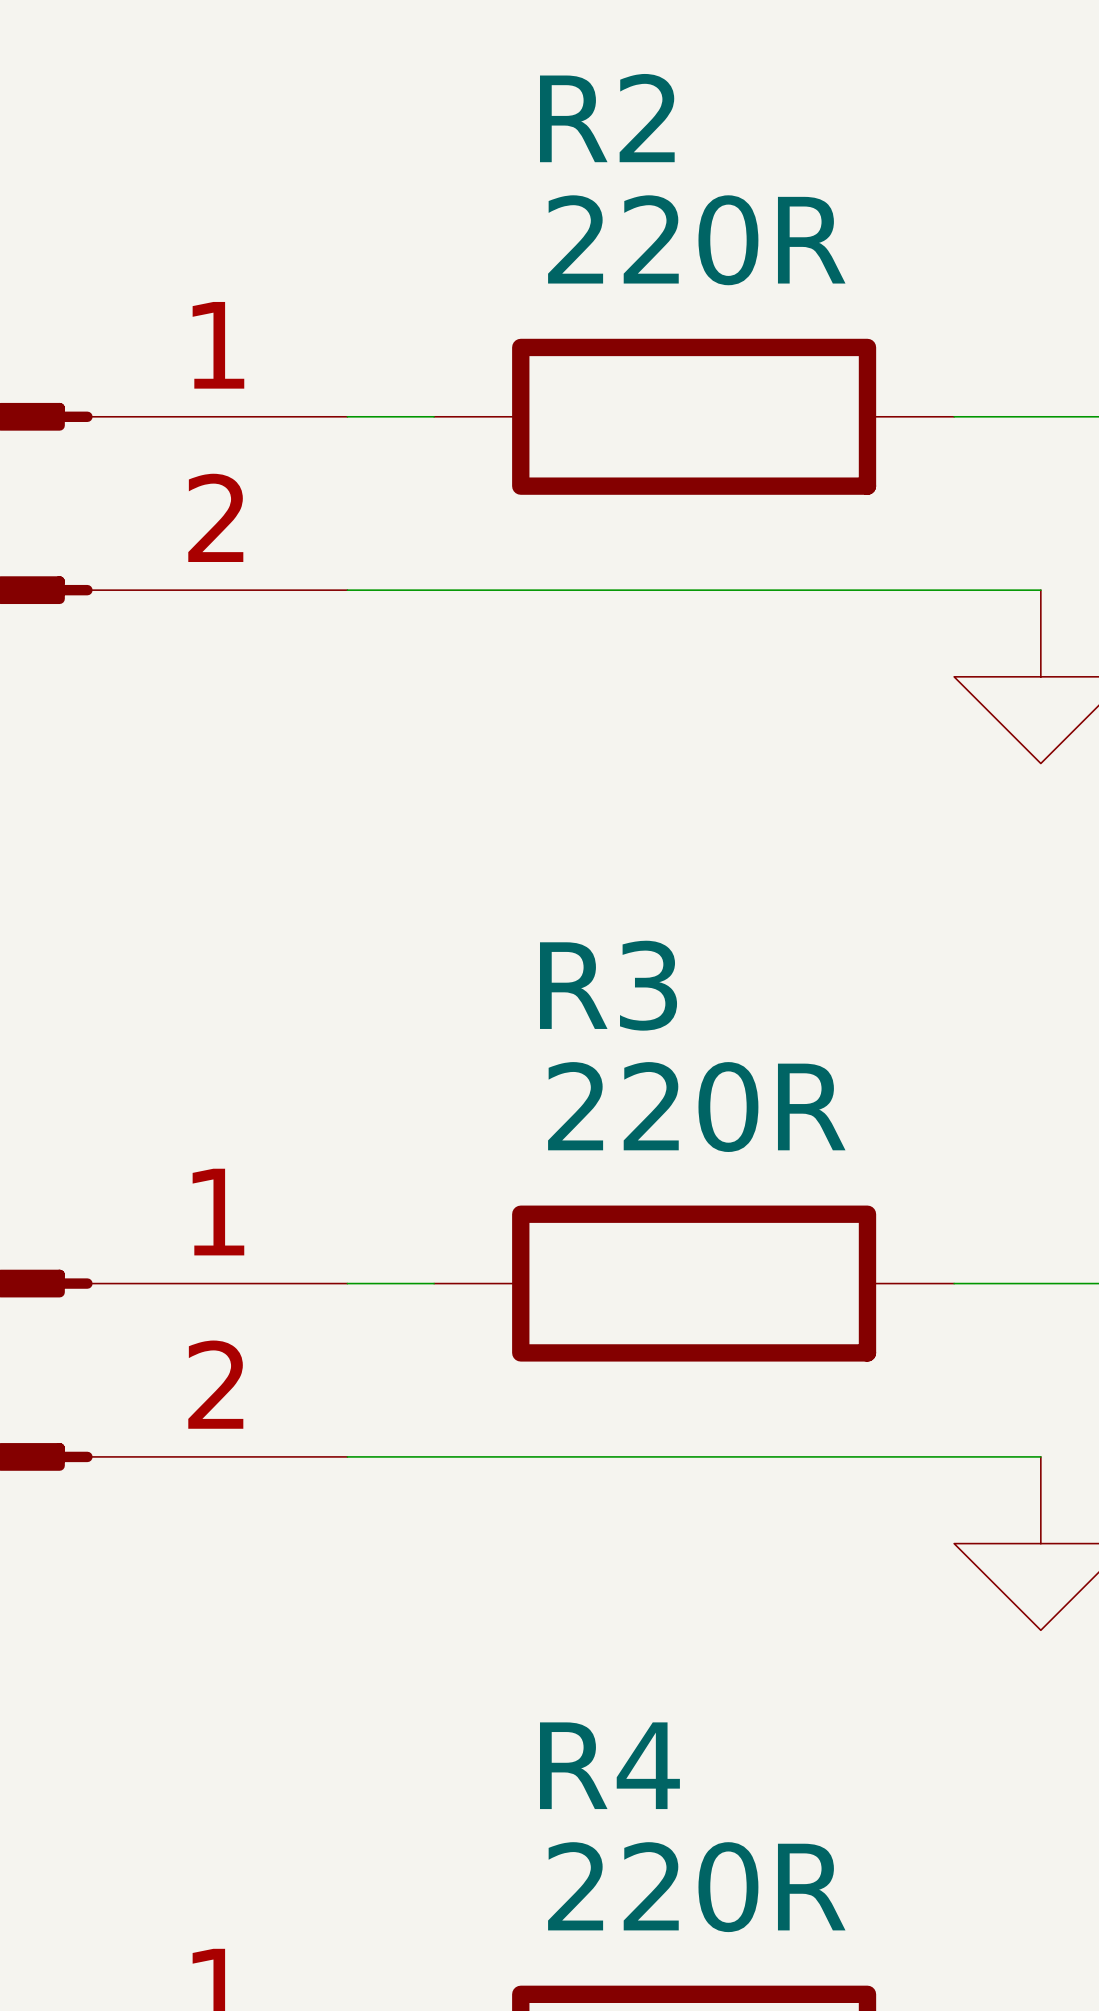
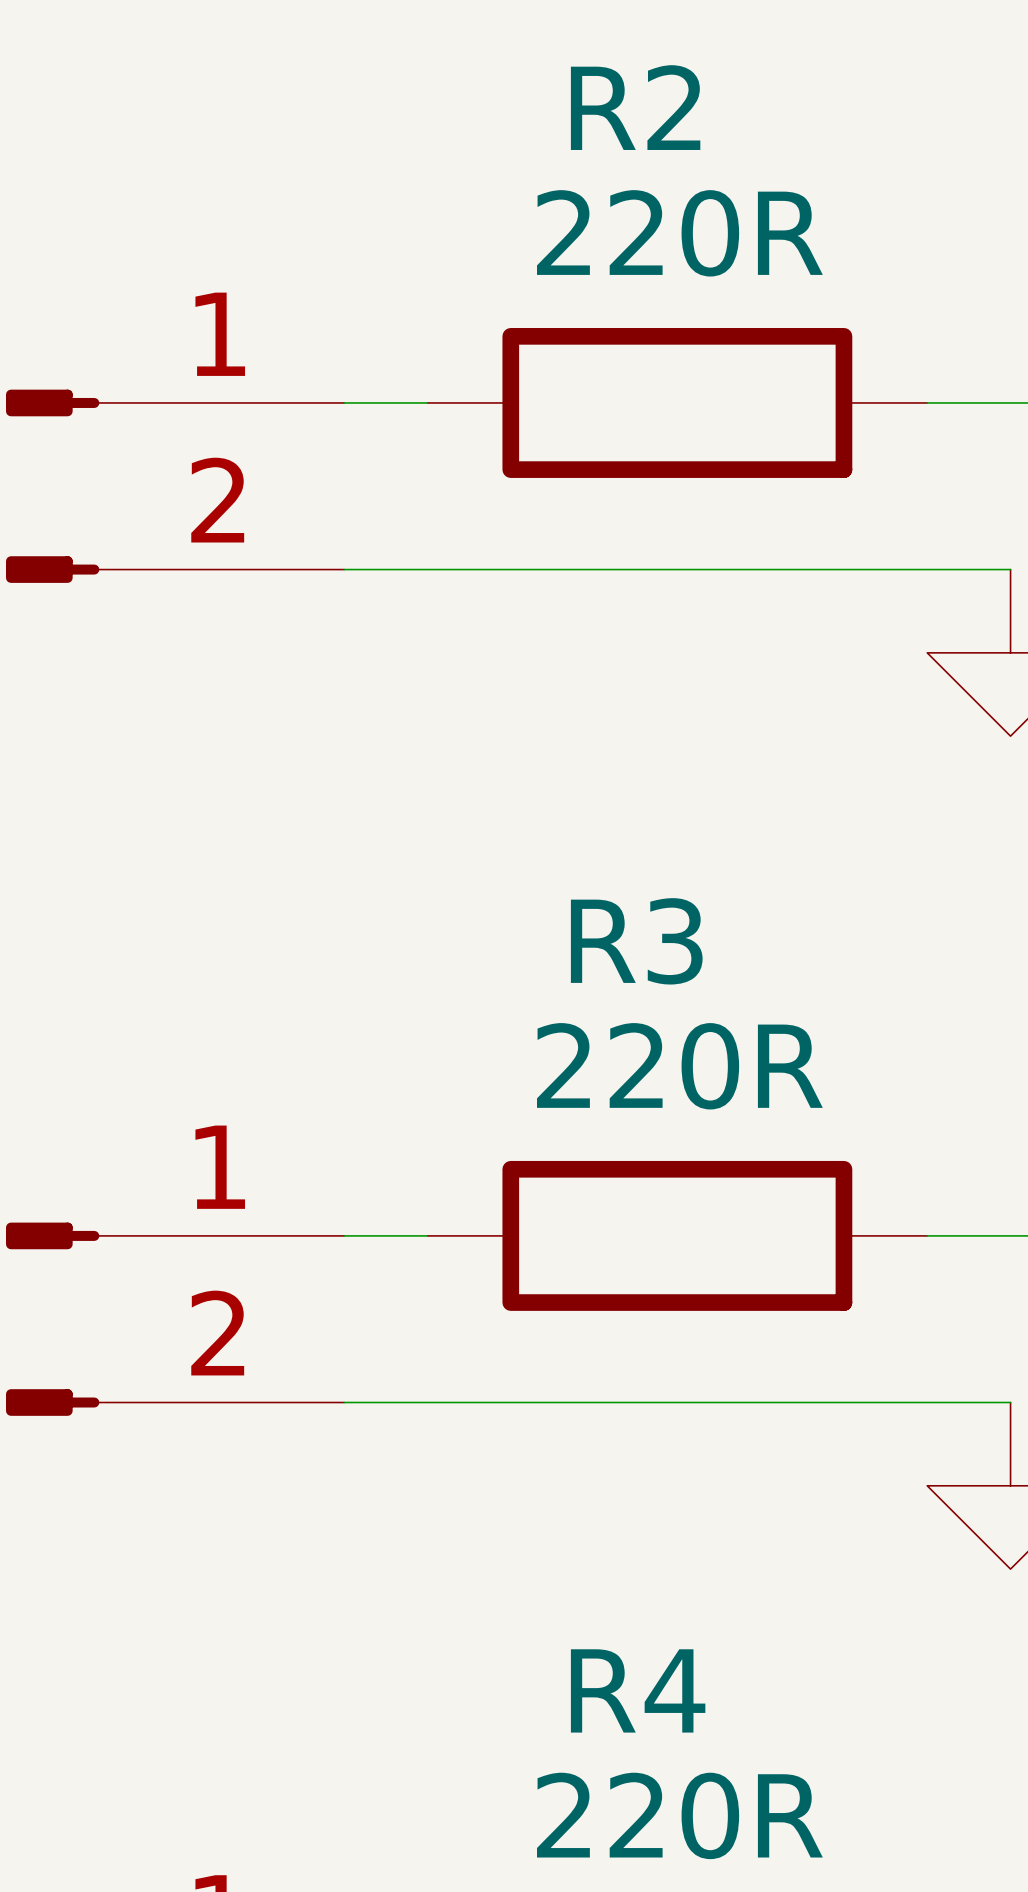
R2 name position: R2 (607, 118) -> R2 (635, 107)
R3 name position: R3 (608, 985) -> R3 (636, 941)
R4 name position: R4 (609, 1765) -> R4 (638, 1690)

